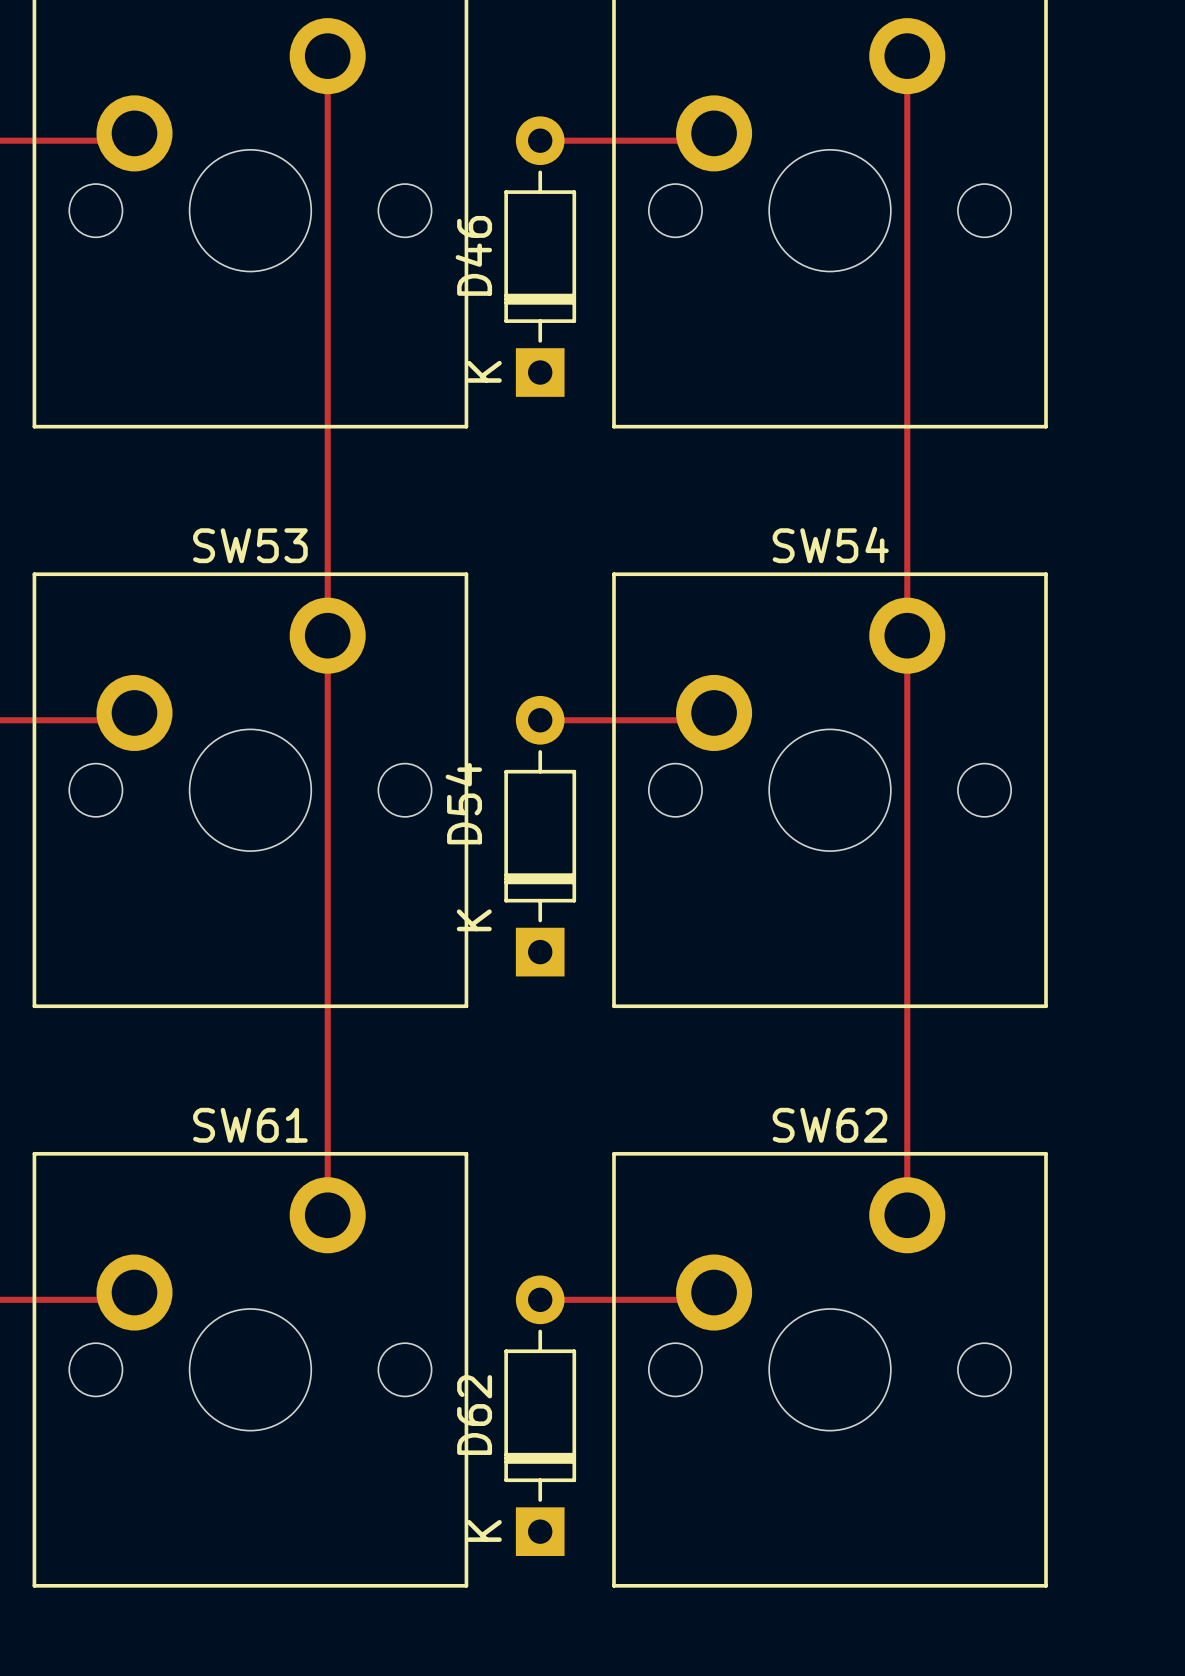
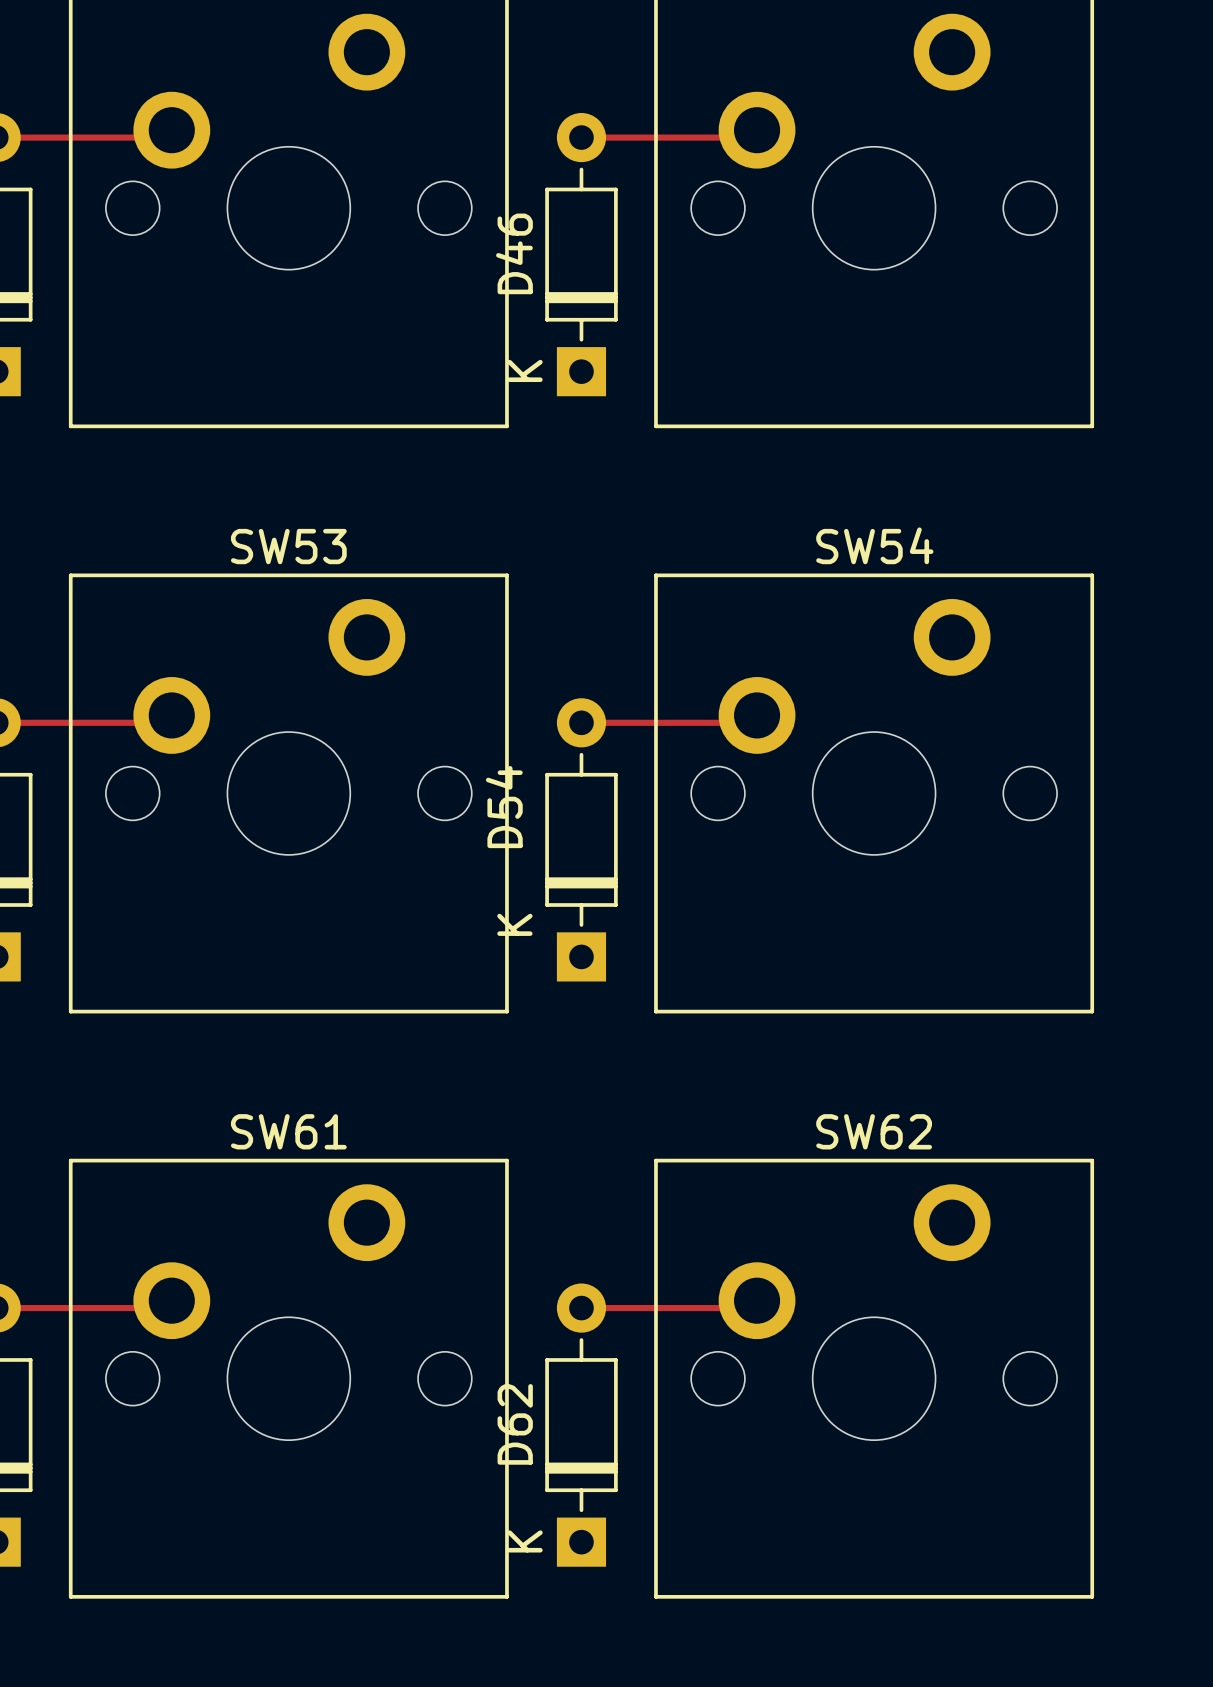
track: (327, 56) (327, 1215) -> none
track: (907, 56) (907, 1215) -> none

